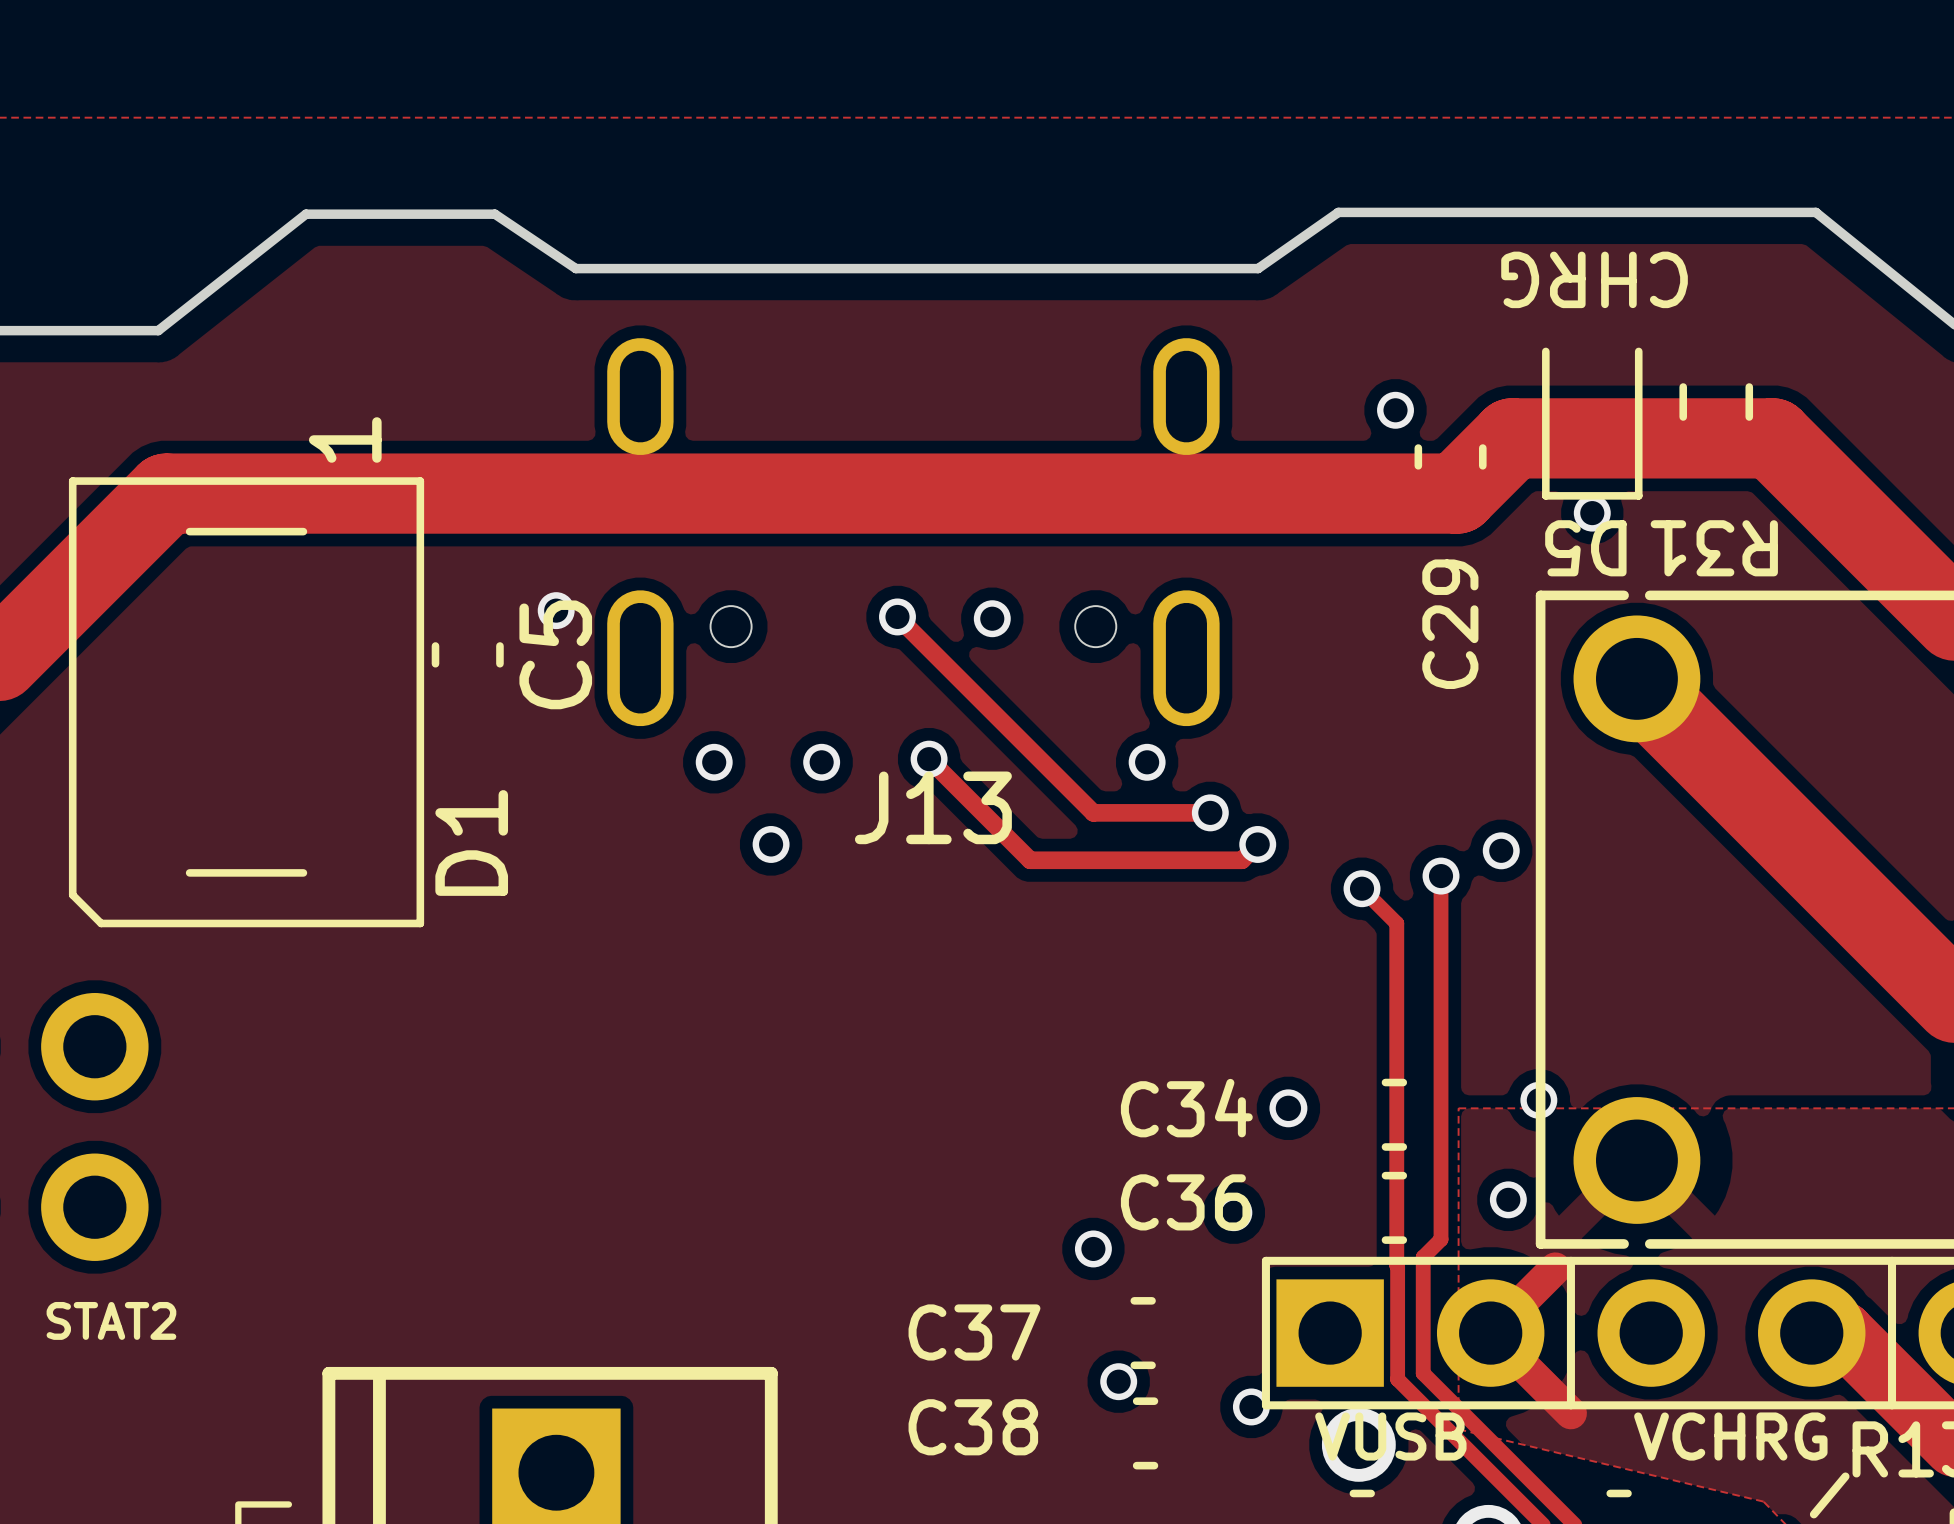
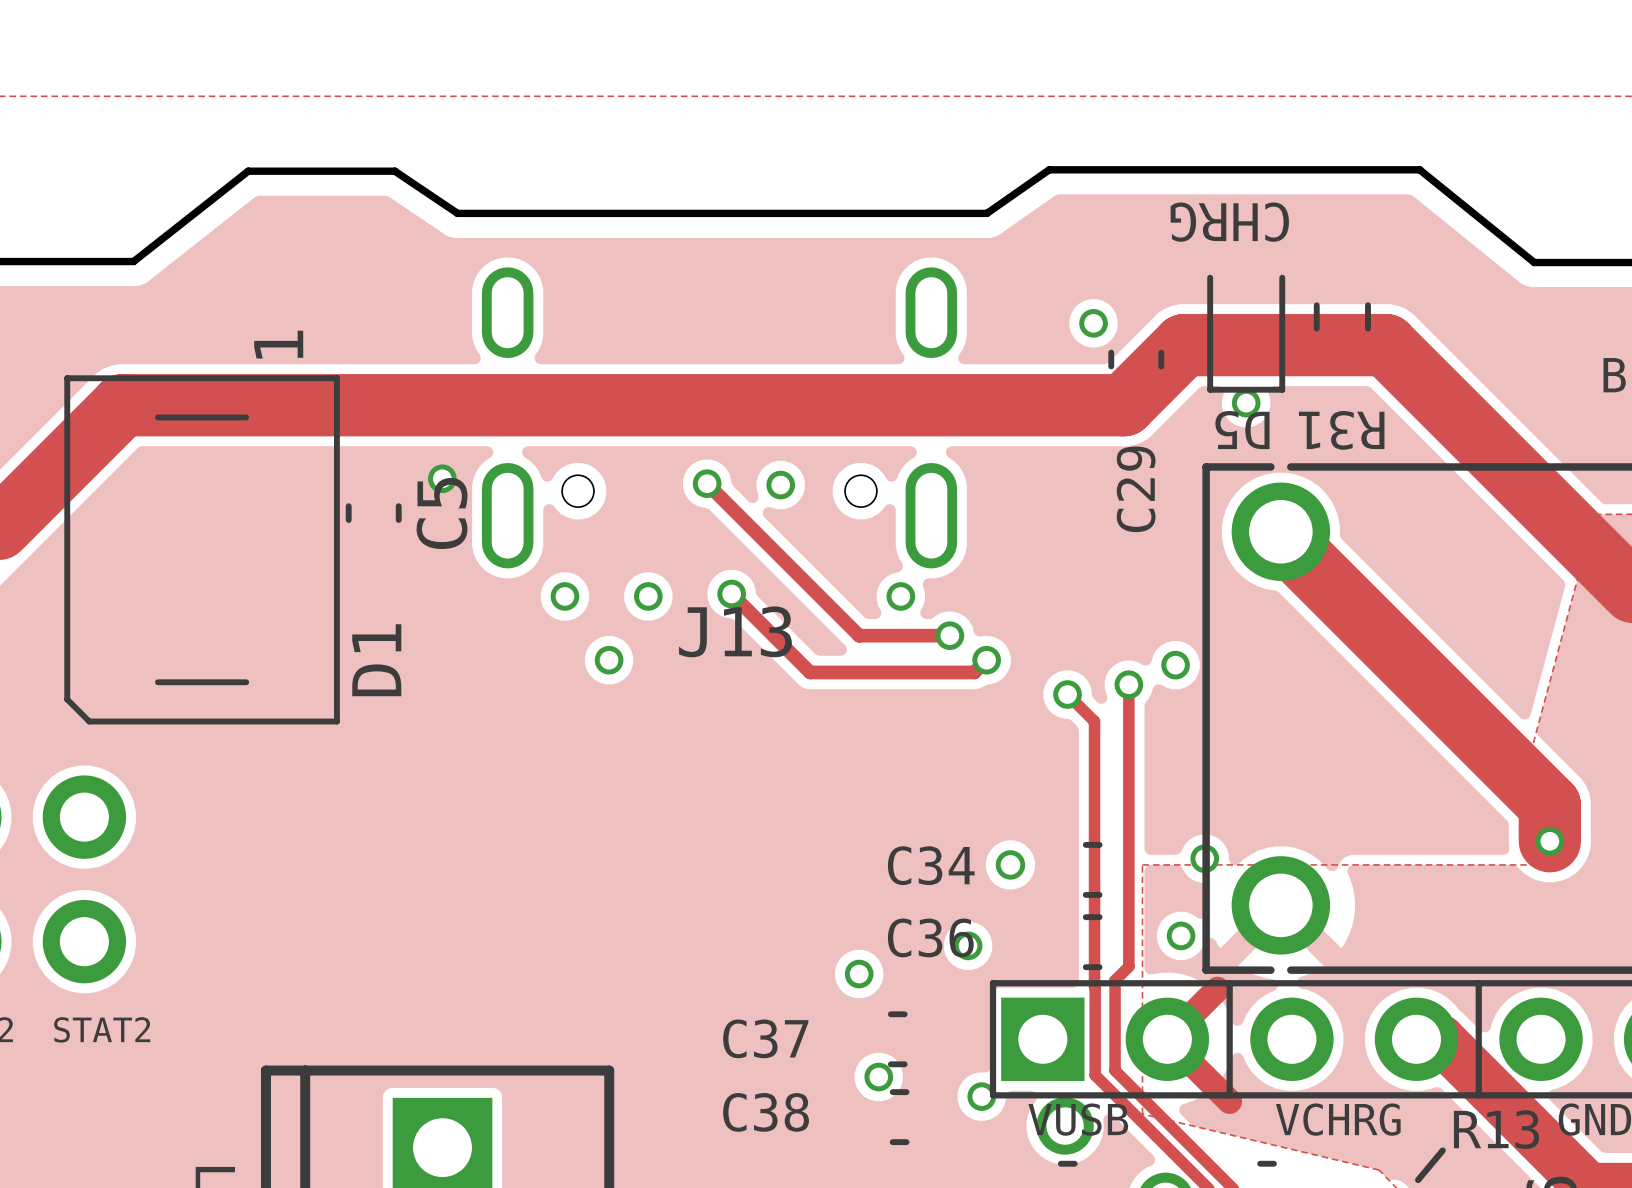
track: (1456, 493) (166, 493) (144, 515) -> (1141, 387) (1123, 405) (122, 405)

